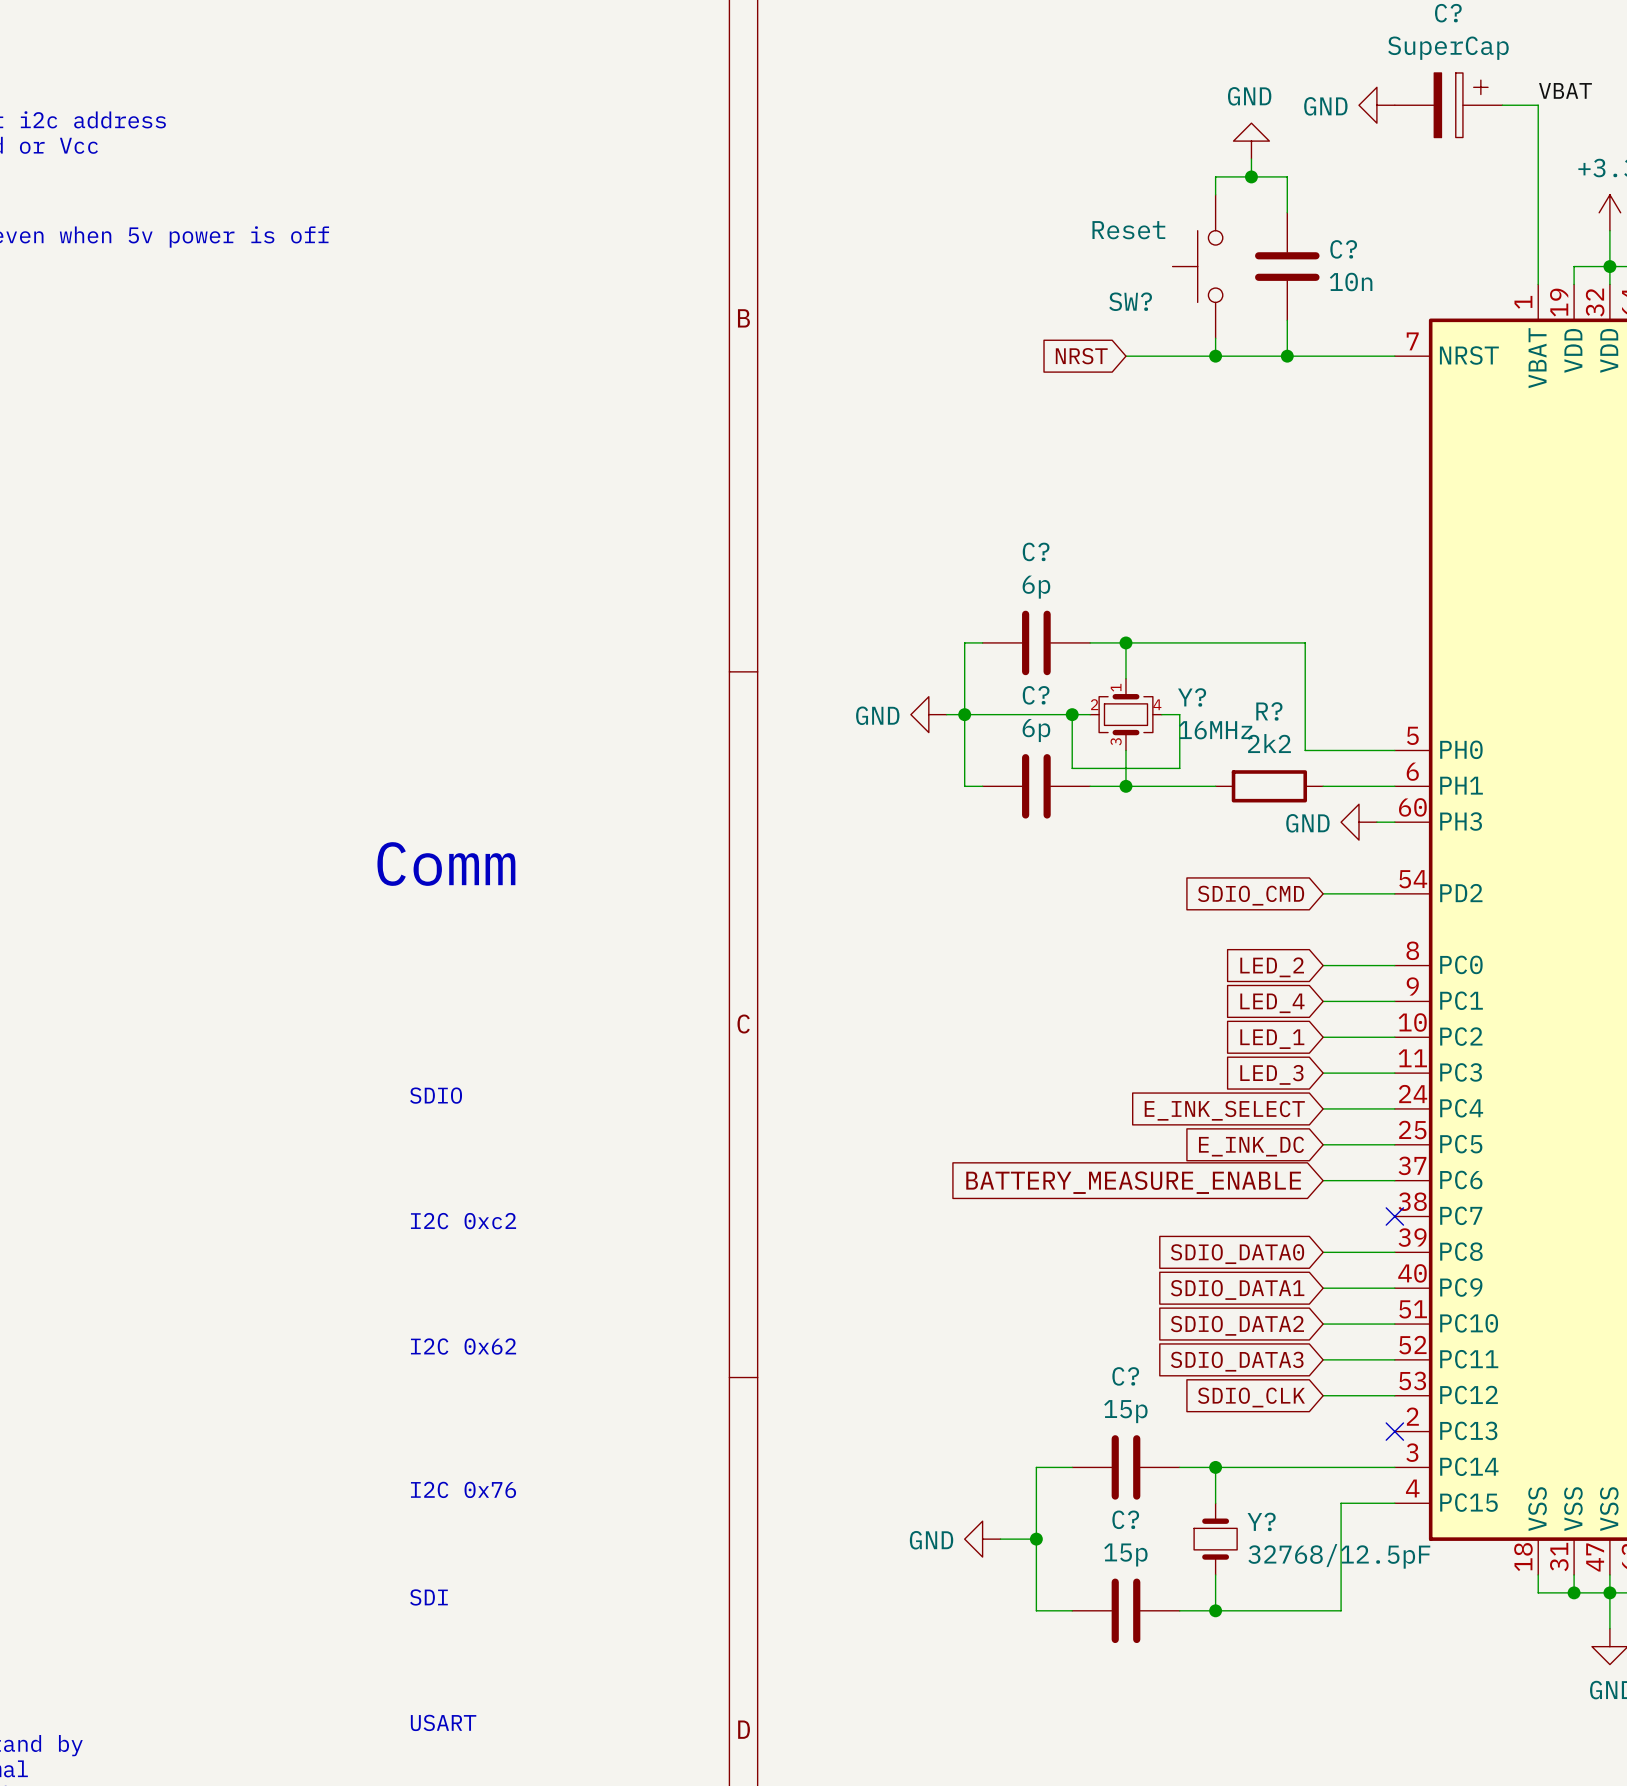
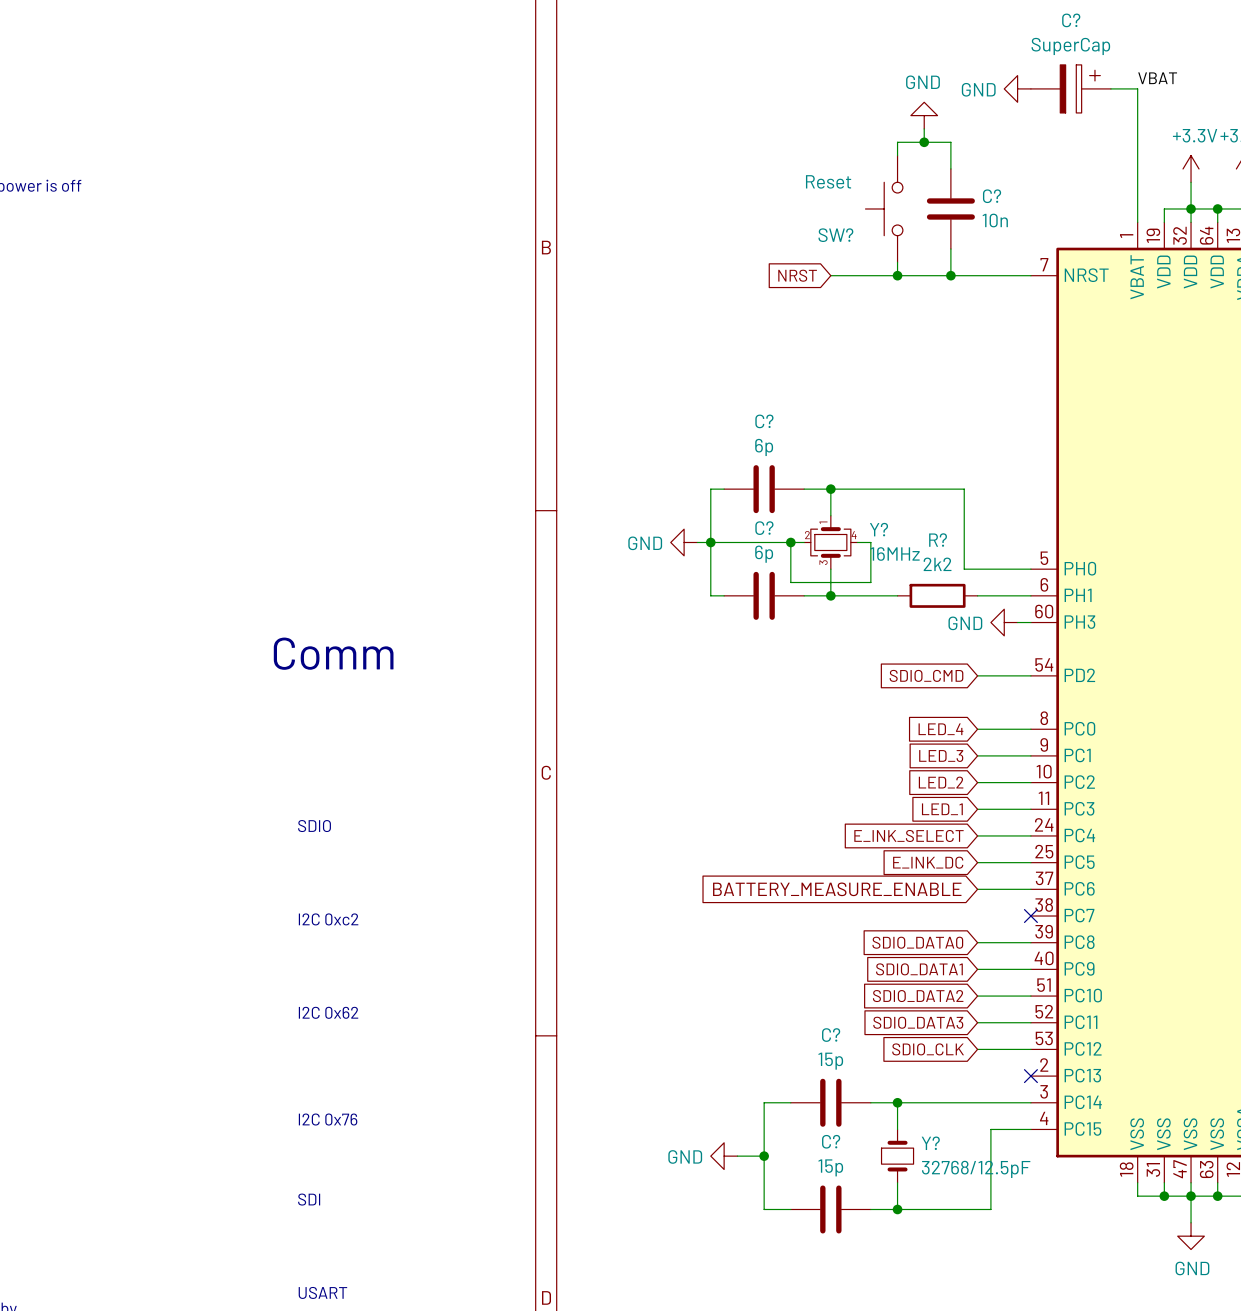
global label: LED_2 (1272, 967) -> LED_4 (940, 729)
global label: LED_4 (1272, 1003) -> LED_3 (941, 756)
global label: LED_1 (1272, 1039) -> LED_2 (941, 782)
global label: LED_3 (1271, 1074) -> LED_1 (942, 809)

